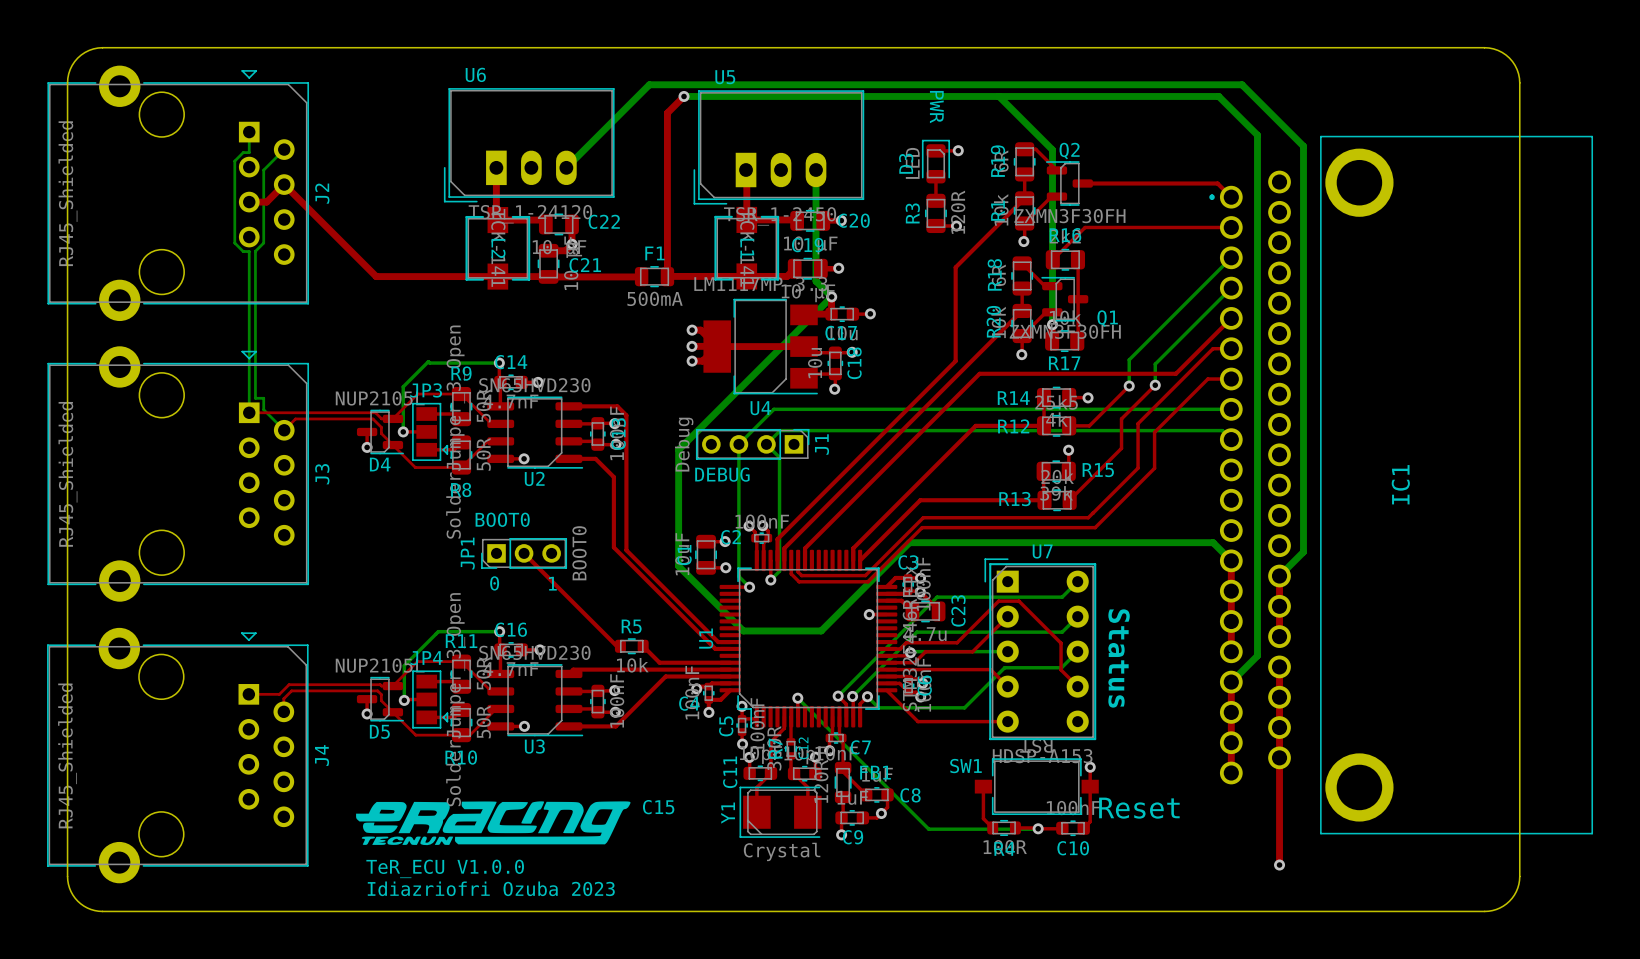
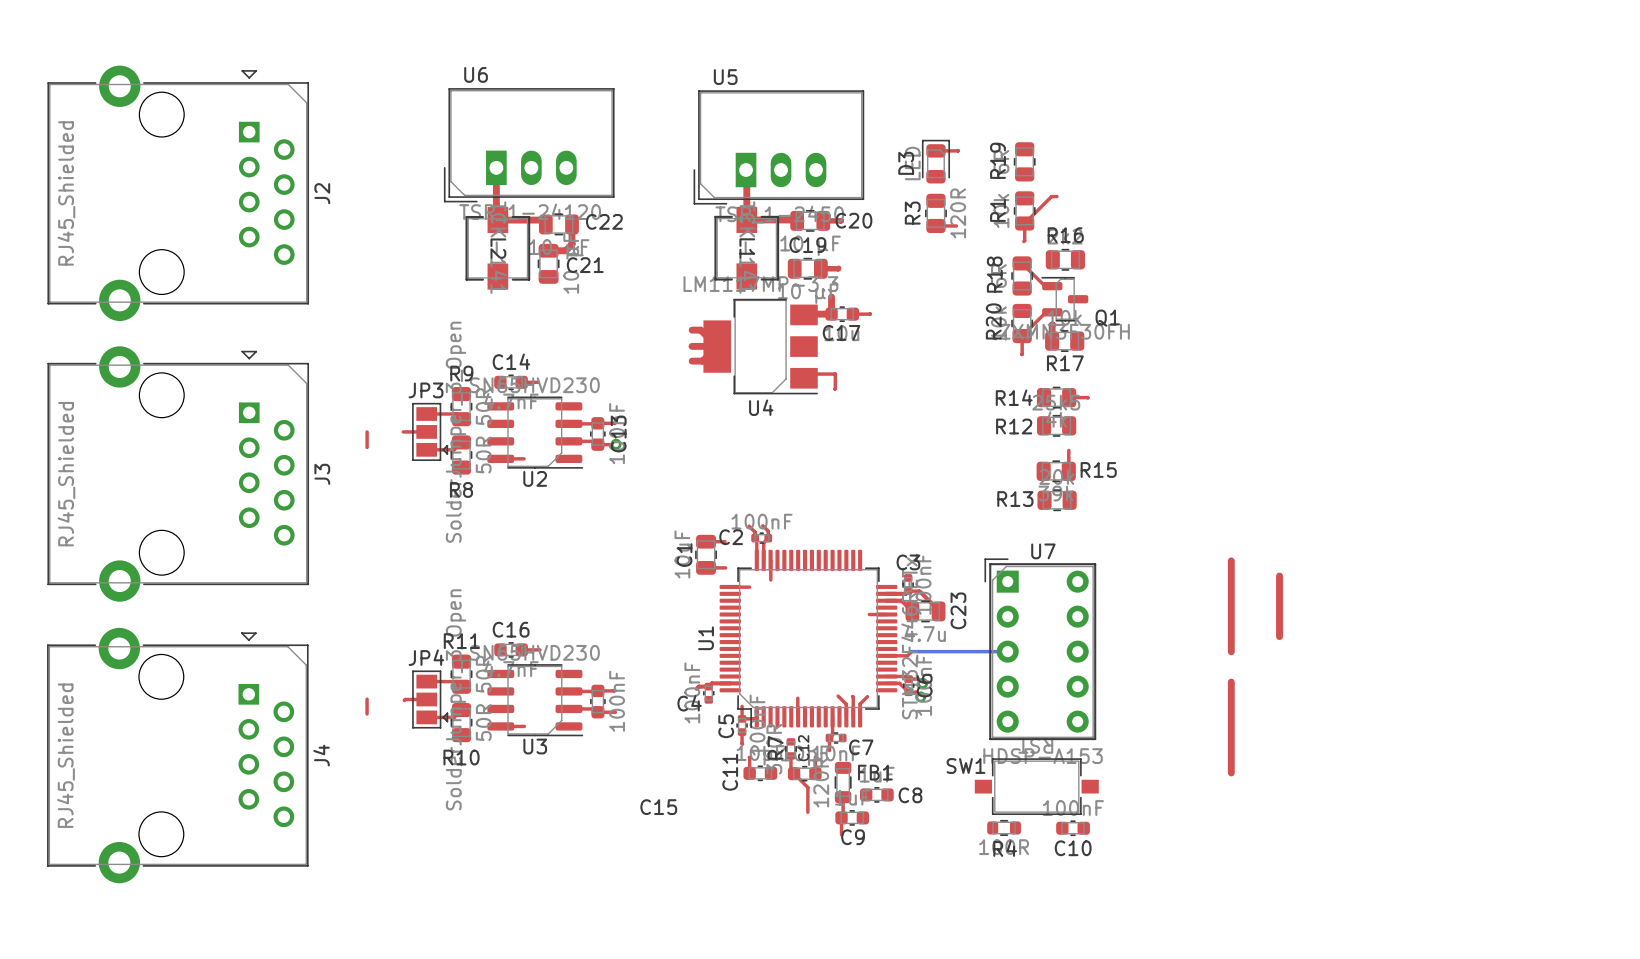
board edge: (1519, 82) (1519, 876) (1514, 895) (1503, 906) (1484, 911) (102, 911) (87, 907) (72, 895) (67, 876) (67, 82) (72, 65) (85, 52) (102, 47) (1484, 47) (1498, 50) (1509, 58) (1517, 69) (1519, 82) -> none
top track: (684, 96) (667, 113) (667, 276) (787, 276) (794, 268) -> none
bottom track: (684, 96) (1218, 96) (1257, 135) (1257, 655) (1231, 682) -> none
via: (684, 96) -> none
bottom track: (999, 96) (1052, 149) (1052, 324) -> none
text: PWR (936, 107) -> none
bottom track: (249, 132) (249, 152) (243, 152) (234, 161) (234, 243) (243, 251) (249, 251) (249, 412) -> none
bottom track: (284, 149) (263, 170) (263, 243) (255, 251) (255, 398) (263, 398) (263, 409) (284, 430) -> none
top track: (1024, 149) (1035, 149) (1056, 170) -> none
via: (958, 150) -> none
bottom track: (566, 167) (649, 84) (1242, 84) (1303, 146) (1303, 552) (1279, 576) -> none
bottom track: (816, 170) (816, 281) (831, 296) (678, 449) (678, 566) (743, 630) (821, 630) (909, 542) (1213, 542) (1231, 560) -> none
top track: (1024, 174) (1024, 198) (955, 267) (955, 361) (777, 539) (777, 560) -> none
top track: (935, 176) (935, 200) -> none
Q2: ZXMN3F30FH (1069, 183) -> none
top track: (1082, 183) (1217, 183) (1231, 197) -> none
top track: (249, 202) (266, 202) (284, 184) (376, 276) (641, 276) -> none
via: (841, 220) -> none
via: (956, 226) -> none
top track: (1231, 227) (1085, 227) (1052, 259) -> none
via: (1023, 241) -> none
via: (572, 244) -> none
bottom track: (1231, 257) (1129, 359) (1129, 386) -> none
top track: (1078, 259) (1077, 341) -> none
via: (838, 268) -> none
F1: 500mA (654, 276) -> none
top track: (1022, 288) (1022, 310) (784, 548) (784, 560) -> none
bottom track: (1231, 288) (1155, 364) (1155, 385) -> none
via: (831, 296) -> none
via: (870, 313) -> none
top track: (1231, 318) (1175, 373) (979, 373) (805, 548) (805, 560) -> none
via: (1052, 324) -> none
via: (692, 330) -> none
via: (692, 346) -> none
top track: (717, 346) (803, 346) (810, 352) (852, 352) -> none
top track: (1231, 348) (1212, 348) (1138, 423) (1138, 468) (1093, 513) -> none
via: (852, 352) -> none
via: (1021, 354) -> none
via: (692, 361) -> none
top track: (499, 363) (500, 406) -> none
bottom track: (499, 363) (428, 361) (403, 386) (403, 431) -> none
via: (499, 363) -> none
C18: 10u (835, 363) -> none
via: (538, 382) -> none
top track: (1231, 383) (1231, 379) (1207, 379) (1154, 432) (1154, 468) (1095, 527) (922, 527) (868, 581) (799, 581) (791, 573) (791, 560) -> none
top track: (1155, 385) (1121, 418) (1121, 448) (1069, 500) -> none
via: (1155, 385) -> none
top track: (1129, 386) (1089, 425) (1069, 425) -> none
via: (1129, 386) -> none
via: (834, 389) -> none
top track: (1044, 397) (1044, 425) (975, 425) (853, 548) (853, 560) -> none
via: (1088, 397) -> none
top track: (568, 406) (617, 406) (626, 415) (626, 550) (718, 642) (730, 642) -> none
bottom track: (1231, 409) (773, 409) (738, 444) (738, 576) (749, 587) -> none
top track: (249, 412) (375, 412) (381, 418) (392, 418) (417, 394) (461, 394) (491, 423) (500, 423) -> none
via: (614, 423) -> none
top track: (284, 430) (295, 418) (373, 418) (381, 427) (381, 433) (415, 467) (461, 467) (487, 441) (500, 441) -> none
D4: NUP2105L (380, 431) -> none
via: (403, 431) -> none
bottom track: (1231, 439) (1222, 430) (780, 430) (766, 444) (779, 457) (779, 571) (770, 580) -> none
J1: Debug (752, 444) -> none
via: (367, 447) -> none
via: (1068, 450) -> none
via: (524, 458) -> none
top track: (568, 458) (595, 458) (613, 477) (613, 547) (715, 648) (730, 648) -> none
top track: (1043, 471) (1044, 500) (920, 500) (860, 560) -> none
text: DEBUG (722, 474) -> none
IC1: (1401, 485) -> none
top track: (1092, 513) (1088, 517) (923, 517) (865, 575) (801, 575) (798, 572) (798, 560) -> none
text: BOOT0 (502, 519) -> none
via: (762, 525) -> none
via: (749, 526) -> none
via: (725, 541) -> none
top track: (524, 553) (616, 646) (620, 646) -> none
JP1: BOOT0 (524, 553) -> none
via: (725, 567) -> none
top track: (920, 578) (895, 577) (886, 586) -> none
via: (920, 578) -> none
via: (770, 580) -> none
bottom track: (1077, 581) (1062, 597) (937, 597) (838, 696) -> none
text: 0 (494, 583) -> none
text: 1 (552, 583) -> none
via: (749, 587) -> none
via: (920, 591) -> none
via: (869, 614) -> none
top track: (1007, 616) (972, 651) (925, 651) (914, 662) (886, 662) -> none
bottom track: (1077, 616) (1062, 632) (916, 632) (852, 696) -> none
top track: (499, 631) (500, 673) -> none
bottom track: (499, 631) (438, 631) (404, 665) (404, 700) -> none
via: (499, 631) -> none
R5: 10k (631, 646) -> none
top track: (643, 646) (659, 662) (730, 662) -> none
top track: (886, 648) (900, 648) (906, 642) (957, 642) (998, 601) (1018, 601) (1061, 643) (1061, 669) (1077, 686) -> none
via: (539, 649) -> none
bottom track: (1077, 651) (1061, 667) (1004, 667) (964, 707) (878, 707) (867, 696) -> none
via: (910, 652) -> none
text: Status (1119, 658) -> none
top track: (1279, 666) (1279, 865) -> none
top track: (730, 669) (573, 669) (568, 673) -> none
top track: (886, 669) (990, 669) (1007, 686) -> none
top track: (730, 676) (665, 676) (615, 726) (568, 726) -> none
via: (696, 688) -> none
via: (614, 690) -> none
top track: (730, 690) (720, 699) (708, 699) (708, 712) -> none
top track: (886, 690) (917, 721) (1007, 721) -> none
top track: (500, 691) (491, 691) (461, 661) (417, 661) (392, 686) (289, 684) (279, 694) (248, 694) -> none
via: (838, 696) -> none
via: (852, 696) -> none
via: (867, 696) -> none
bottom track: (797, 698) (928, 829) (1038, 828) -> none
via: (797, 698) -> none
D5: NUP2105L (380, 699) -> none
via: (404, 700) -> none
via: (742, 706) -> none
top track: (500, 708) (496, 708) (469, 735) (415, 735) (381, 700) (381, 694) (377, 690) (291, 690) (283, 698) (283, 711) -> none
via: (615, 712) -> none
via: (708, 712) -> none
via: (367, 713) -> none
top track: (784, 716) (784, 728) (771, 741) (771, 773) (756, 787) (756, 812) -> none
top track: (791, 716) (790, 741) -> none
top track: (839, 716) (839, 734) (843, 738) (843, 771) (866, 794) -> none
via: (524, 726) -> none
via: (742, 744) -> none
via: (829, 750) -> none
via: (749, 757) -> none
via: (815, 757) -> none
top track: (1090, 767) (1090, 821) (1083, 828) -> none
via: (1090, 767) -> none
top track: (983, 786) (983, 818) (992, 827) -> none
top track: (887, 794) (887, 807) (877, 817) (862, 817) -> none
drawing: [356, 801, 631, 846] -> none
text: Reset (1139, 808) -> none
Y1: Crystal (780, 812) -> none
via: (881, 813) -> none
top track: (1015, 827) (1062, 827) -> none
via: (1038, 828) -> none
via: (841, 834) -> none
via: (1279, 865) -> none
text: TeR_ECU V1.0.0 (445, 868) -> none
text: Idiazriofri Ozuba 2023 (491, 888) -> none

